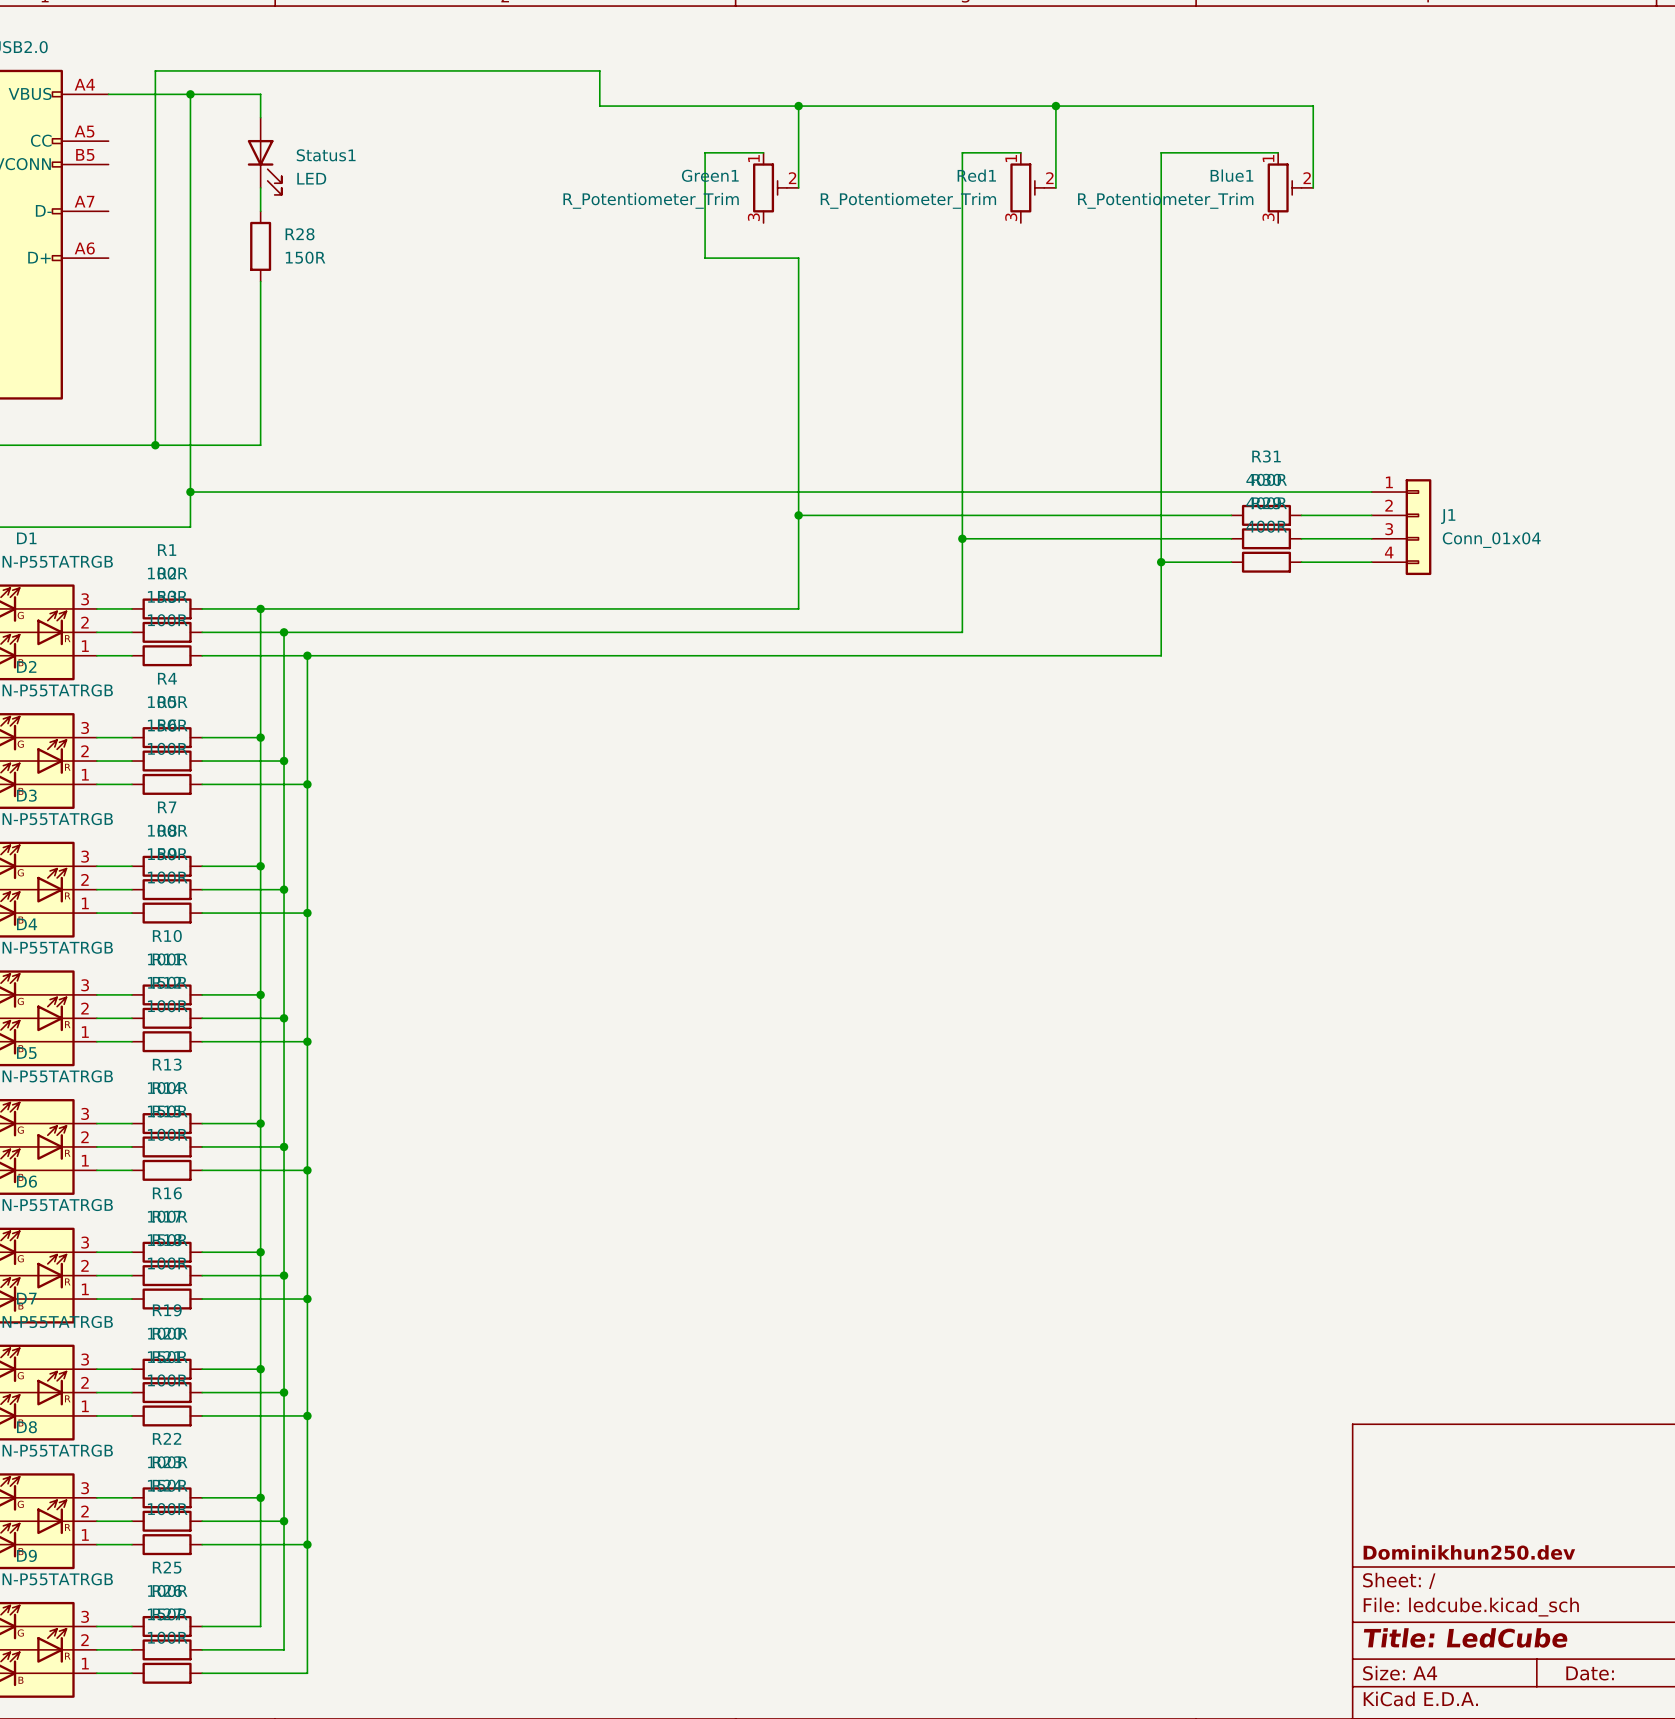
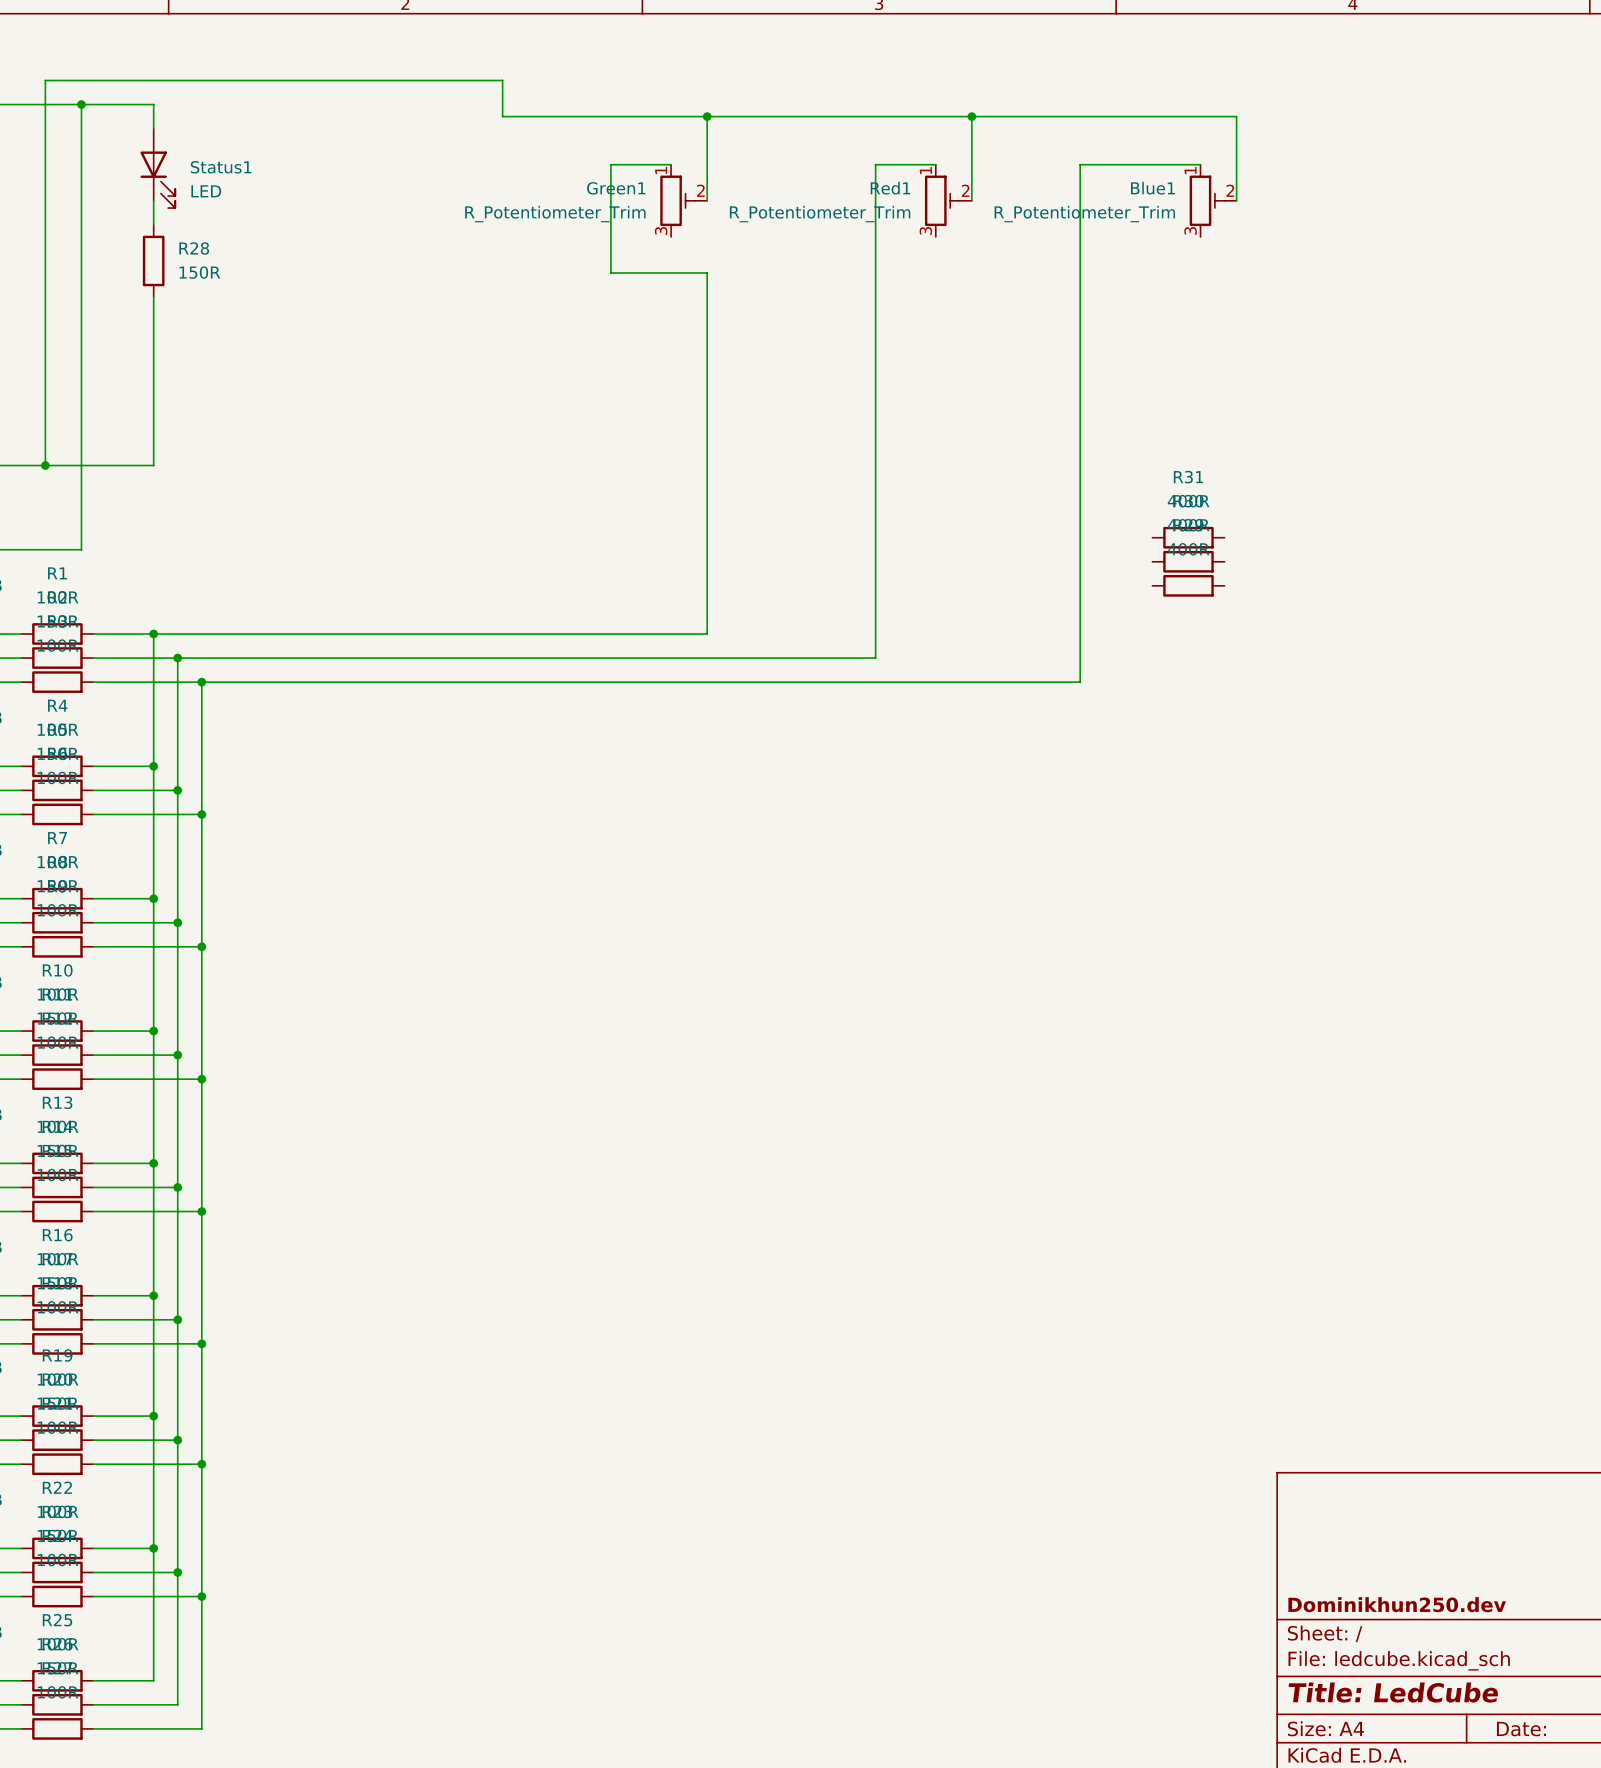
wire: (190, 492) (1371, 492) -> none
junction: (190, 492) -> none
wire: (798, 515) (1231, 515) -> none
junction: (798, 515) -> none
wire: (1301, 515) (1371, 515) -> none
J1: Conn_01x04 (1401, 527) -> none
wire: (962, 538) (1231, 538) -> none
junction: (962, 538) -> none
wire: (1301, 538) (1371, 538) -> none
wire: (1161, 562) (1231, 562) -> none
junction: (1161, 562) -> none
wire: (1301, 562) (1371, 562) -> none

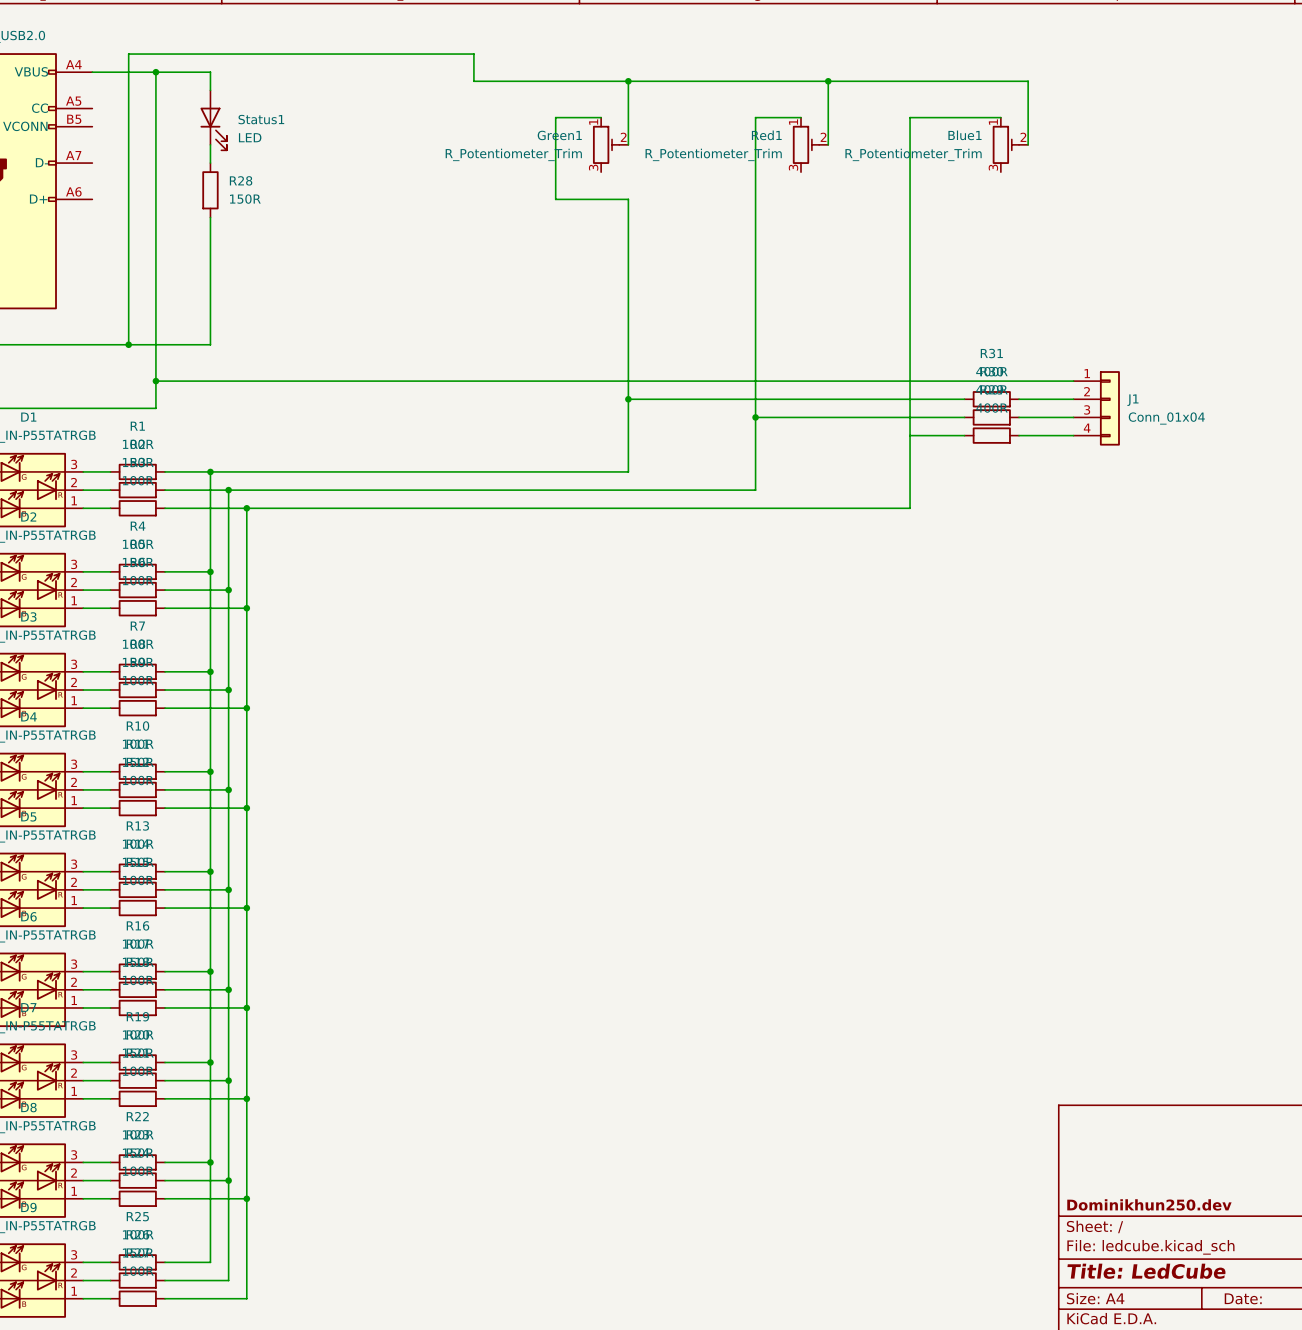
wire: none -> (155, 381) (1073, 381)
junction: none -> (155, 381)
wire: none -> (628, 399) (964, 399)
junction: none -> (628, 399)
wire: none -> (1019, 399) (1073, 399)
J1: none -> Conn_01x04 (1096, 408)
wire: none -> (755, 417) (964, 417)
junction: none -> (755, 417)
wire: none -> (1019, 417) (1073, 417)
wire: none -> (910, 435) (964, 435)
wire: none -> (1019, 435) (1073, 435)

